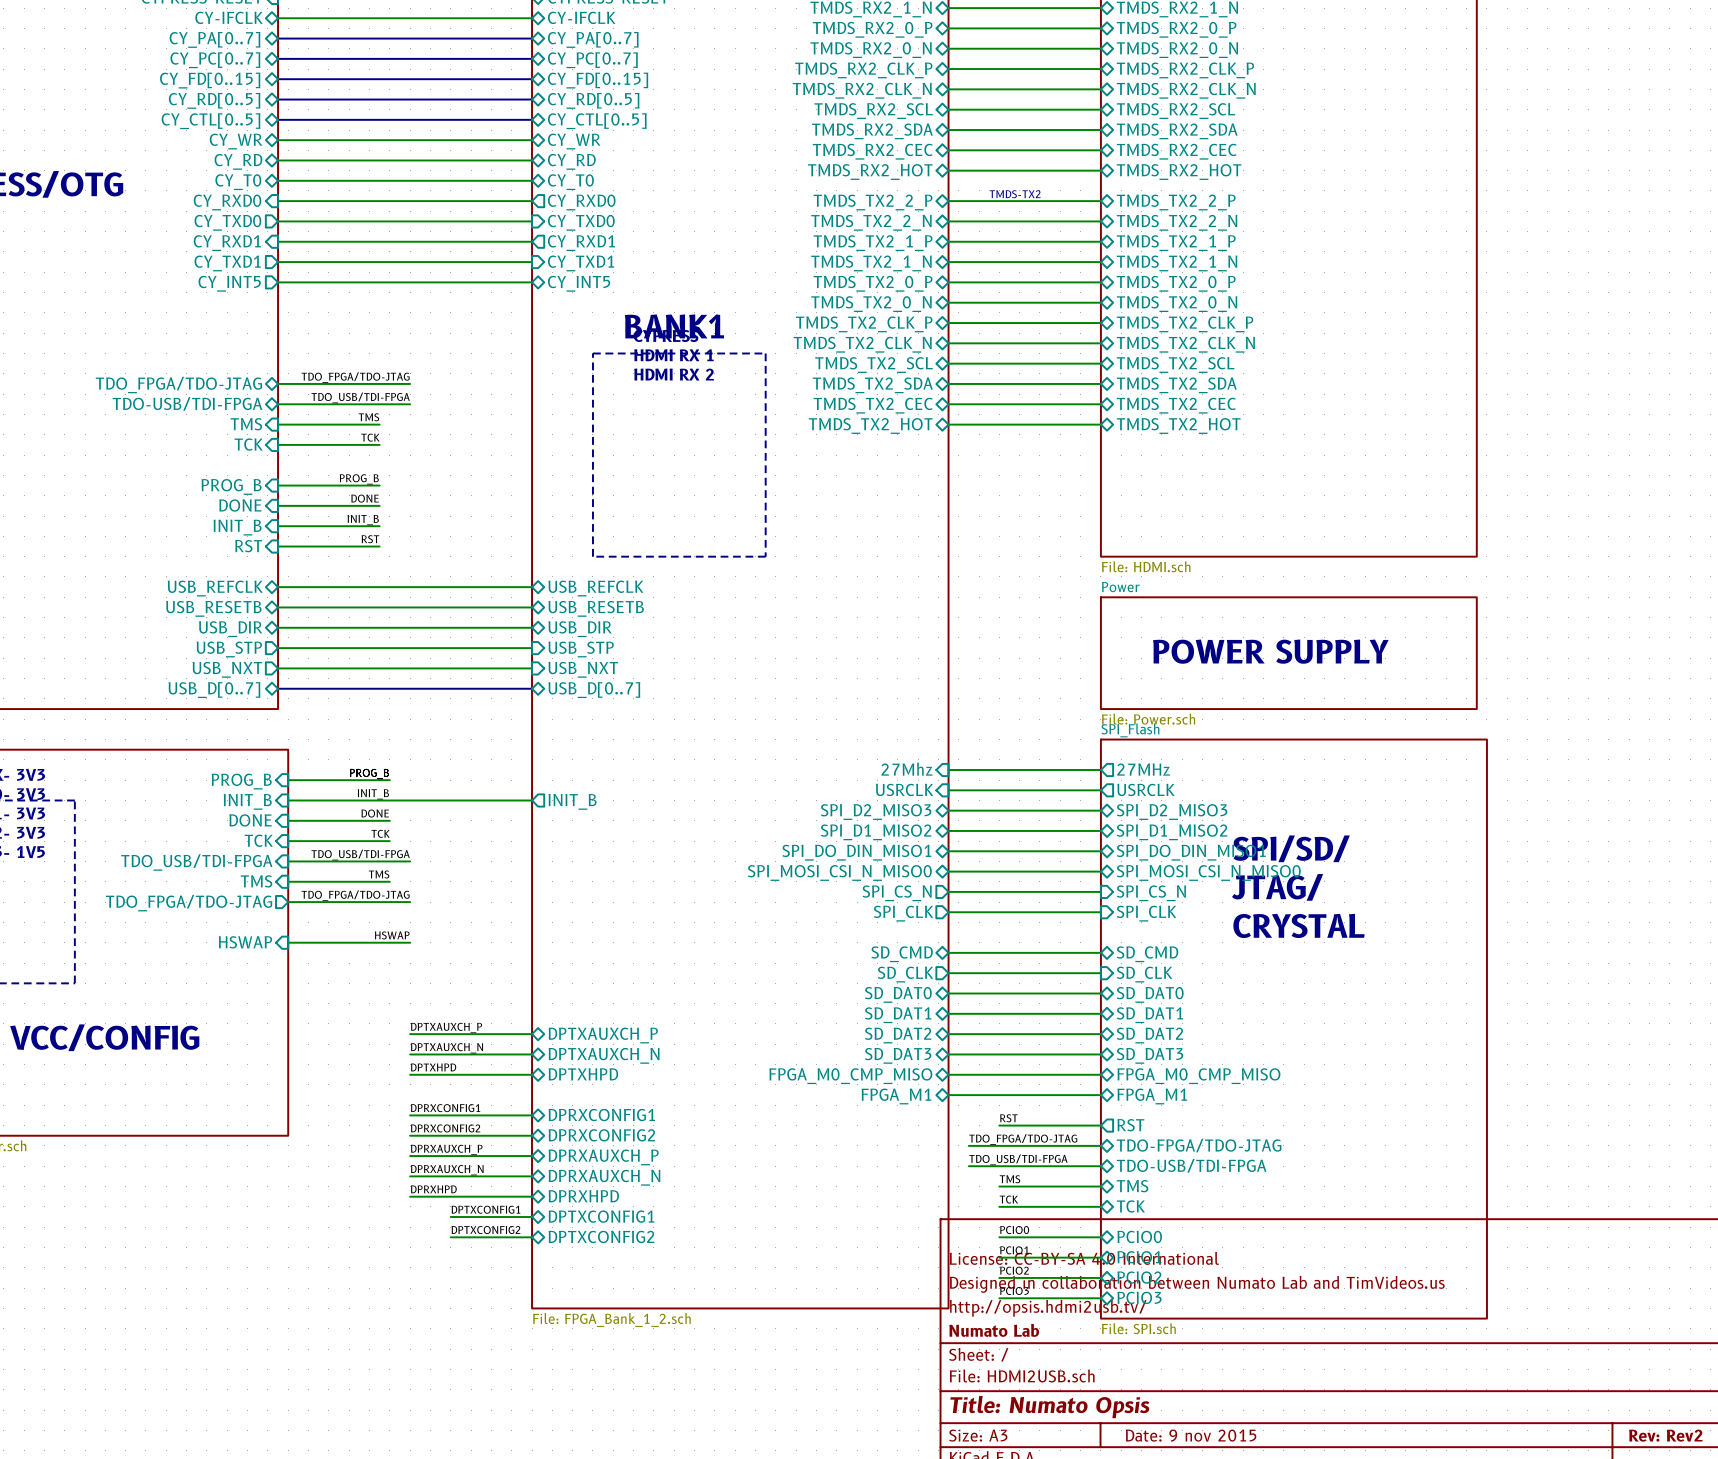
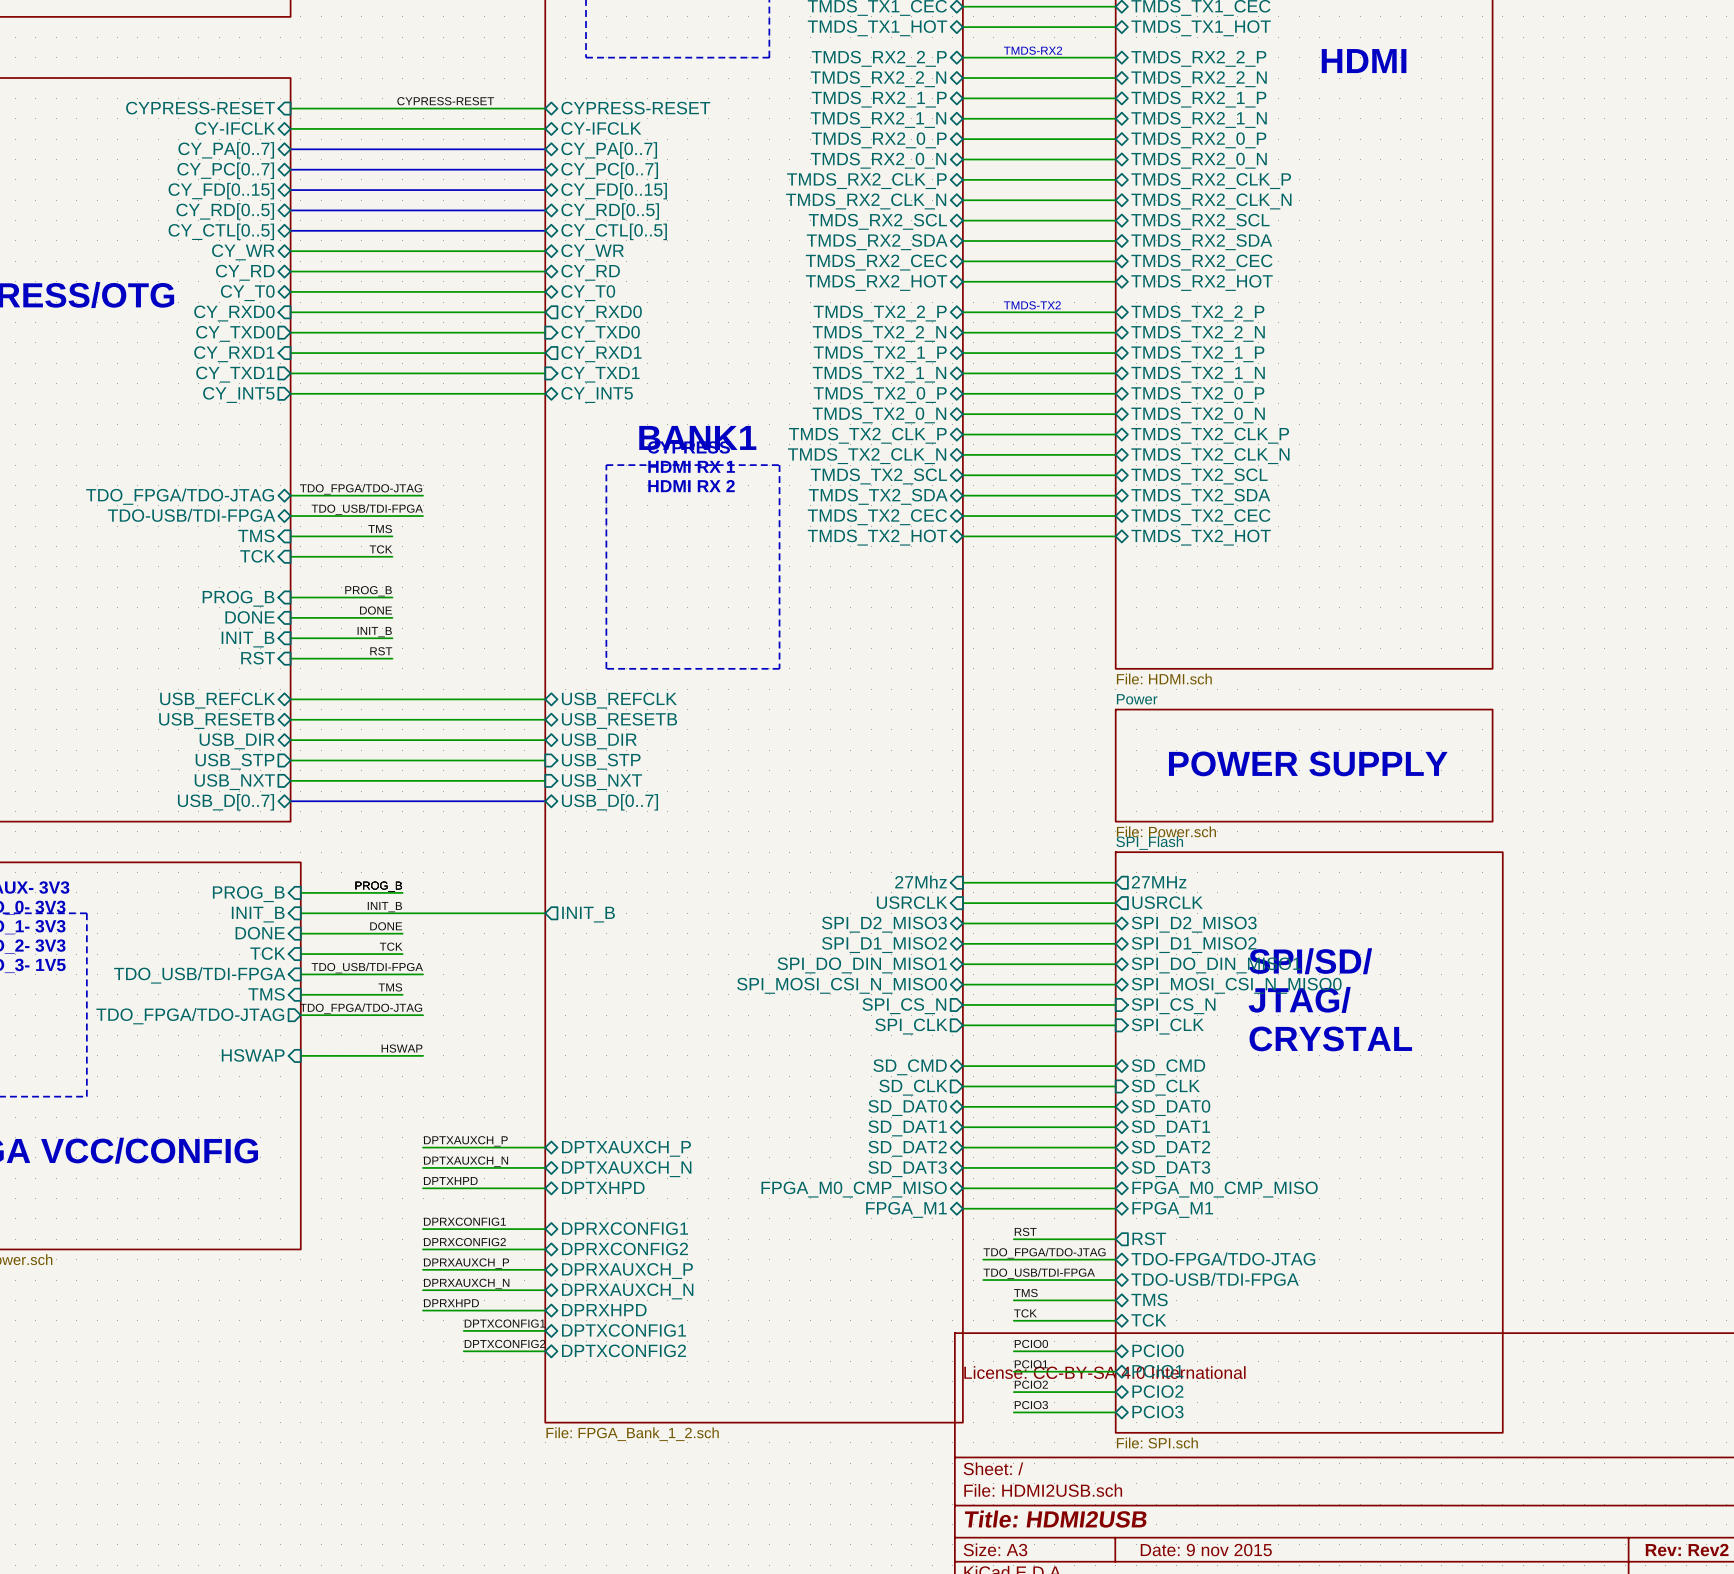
title block: Designed in collaboration between Numato Lab and TimVideos.us (1197, 1284) -> none
title block: http://opsis.hdmi2usb.tv/ (1048, 1308) -> none
title block: Numato Lab (994, 1330) -> none
title block: Title: Numato Opsis (1049, 1407) -> Title: HDMI2USB (1055, 1519)

